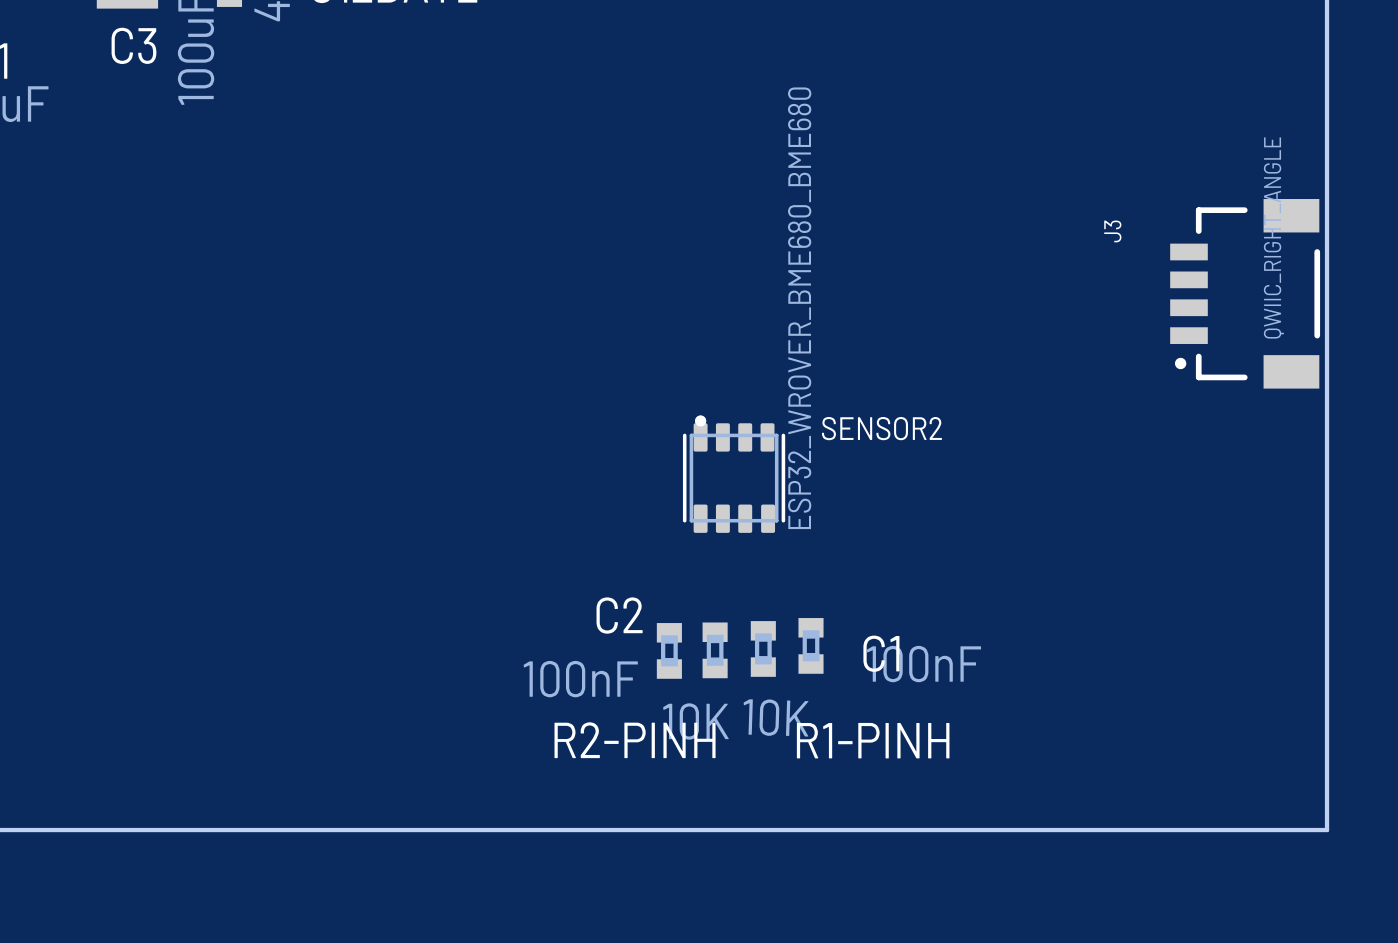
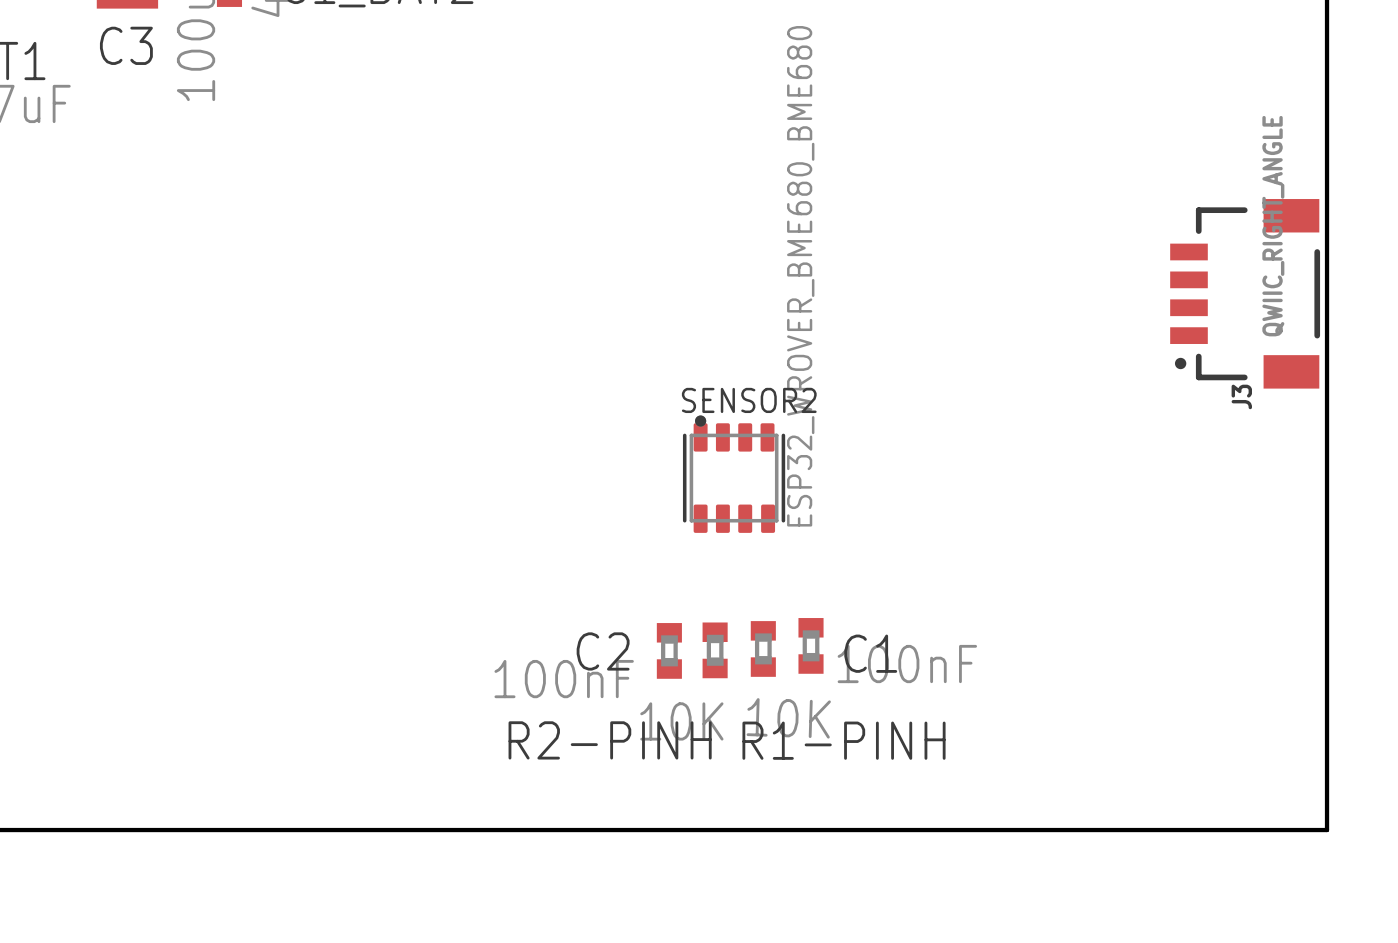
J3 name position: J3 (1112, 231) -> J3 (1241, 396)
SENSOR2 name position: SENSOR2 (881, 428) -> SENSOR2 (749, 400)
C2 name position: C2 (619, 615) -> C2 (603, 651)

